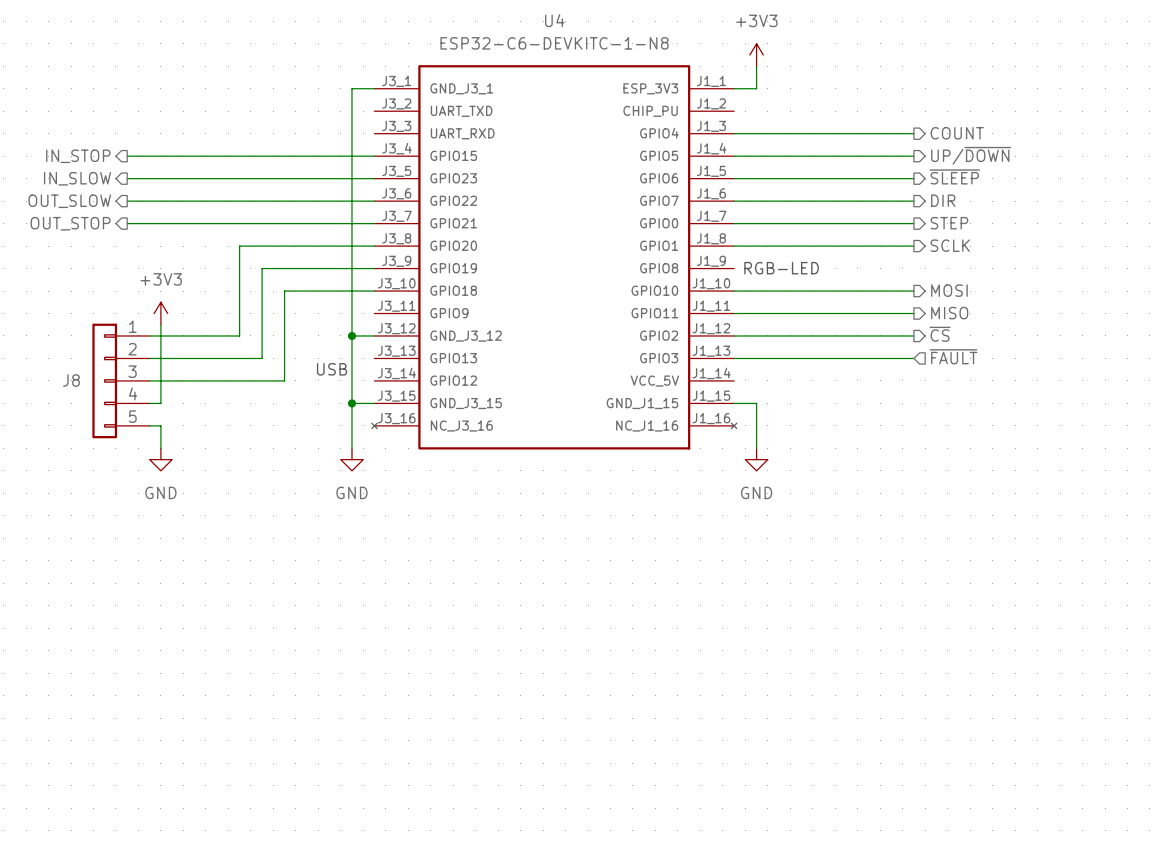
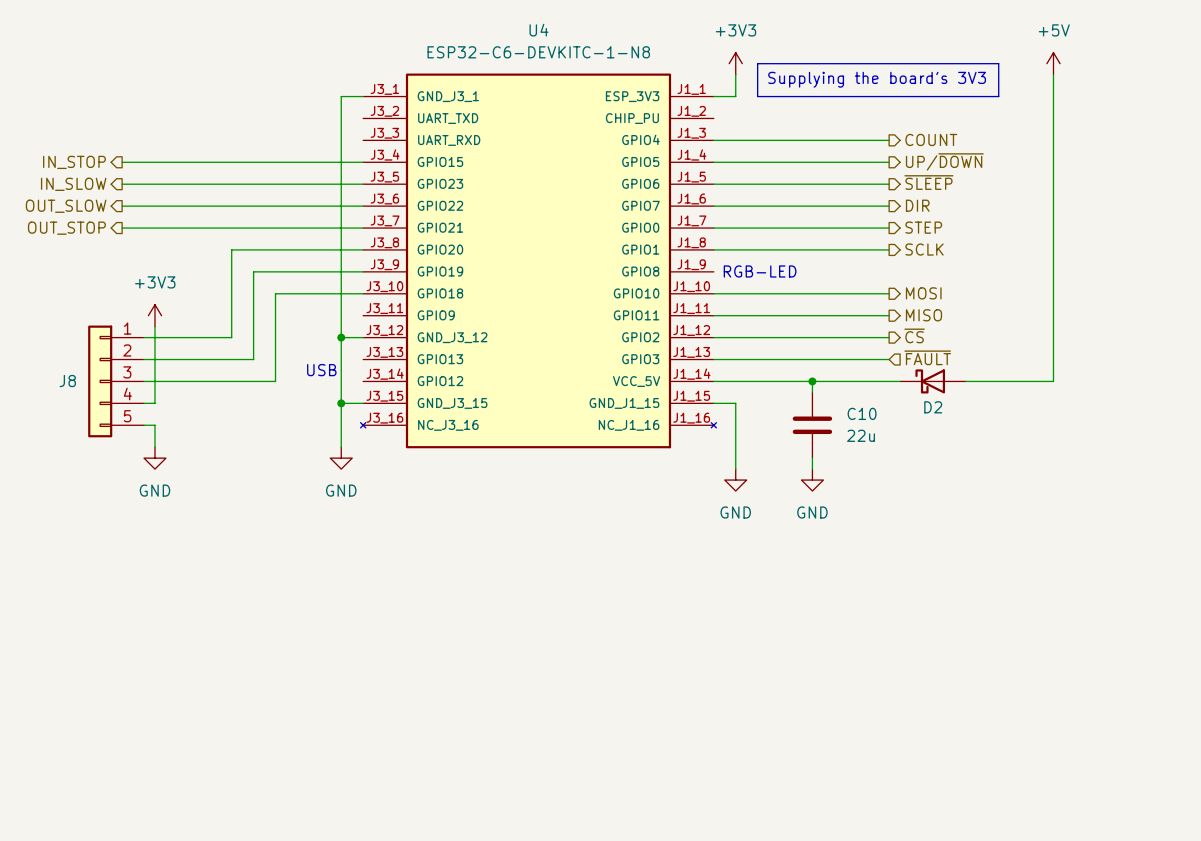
line: none -> (757, 63) (998, 63) (998, 96) (757, 96) (757, 63)
power symbol: none -> +5V (1053, 63)
wire: none -> (1053, 74) (1053, 381) (965, 381)
text: none -> Supplying the board's 3V3 (877, 79)
wire: none -> (713, 381) (900, 381)
wire: none -> (812, 381) (812, 392)
junction: none -> (812, 381)
D2: none -> (932, 381)
C10: none -> 22u (812, 425)
power symbol position: GND (756, 459) -> GND (735, 480)
wire: none -> (812, 458) (812, 469)
power symbol: none -> GND (812, 480)

